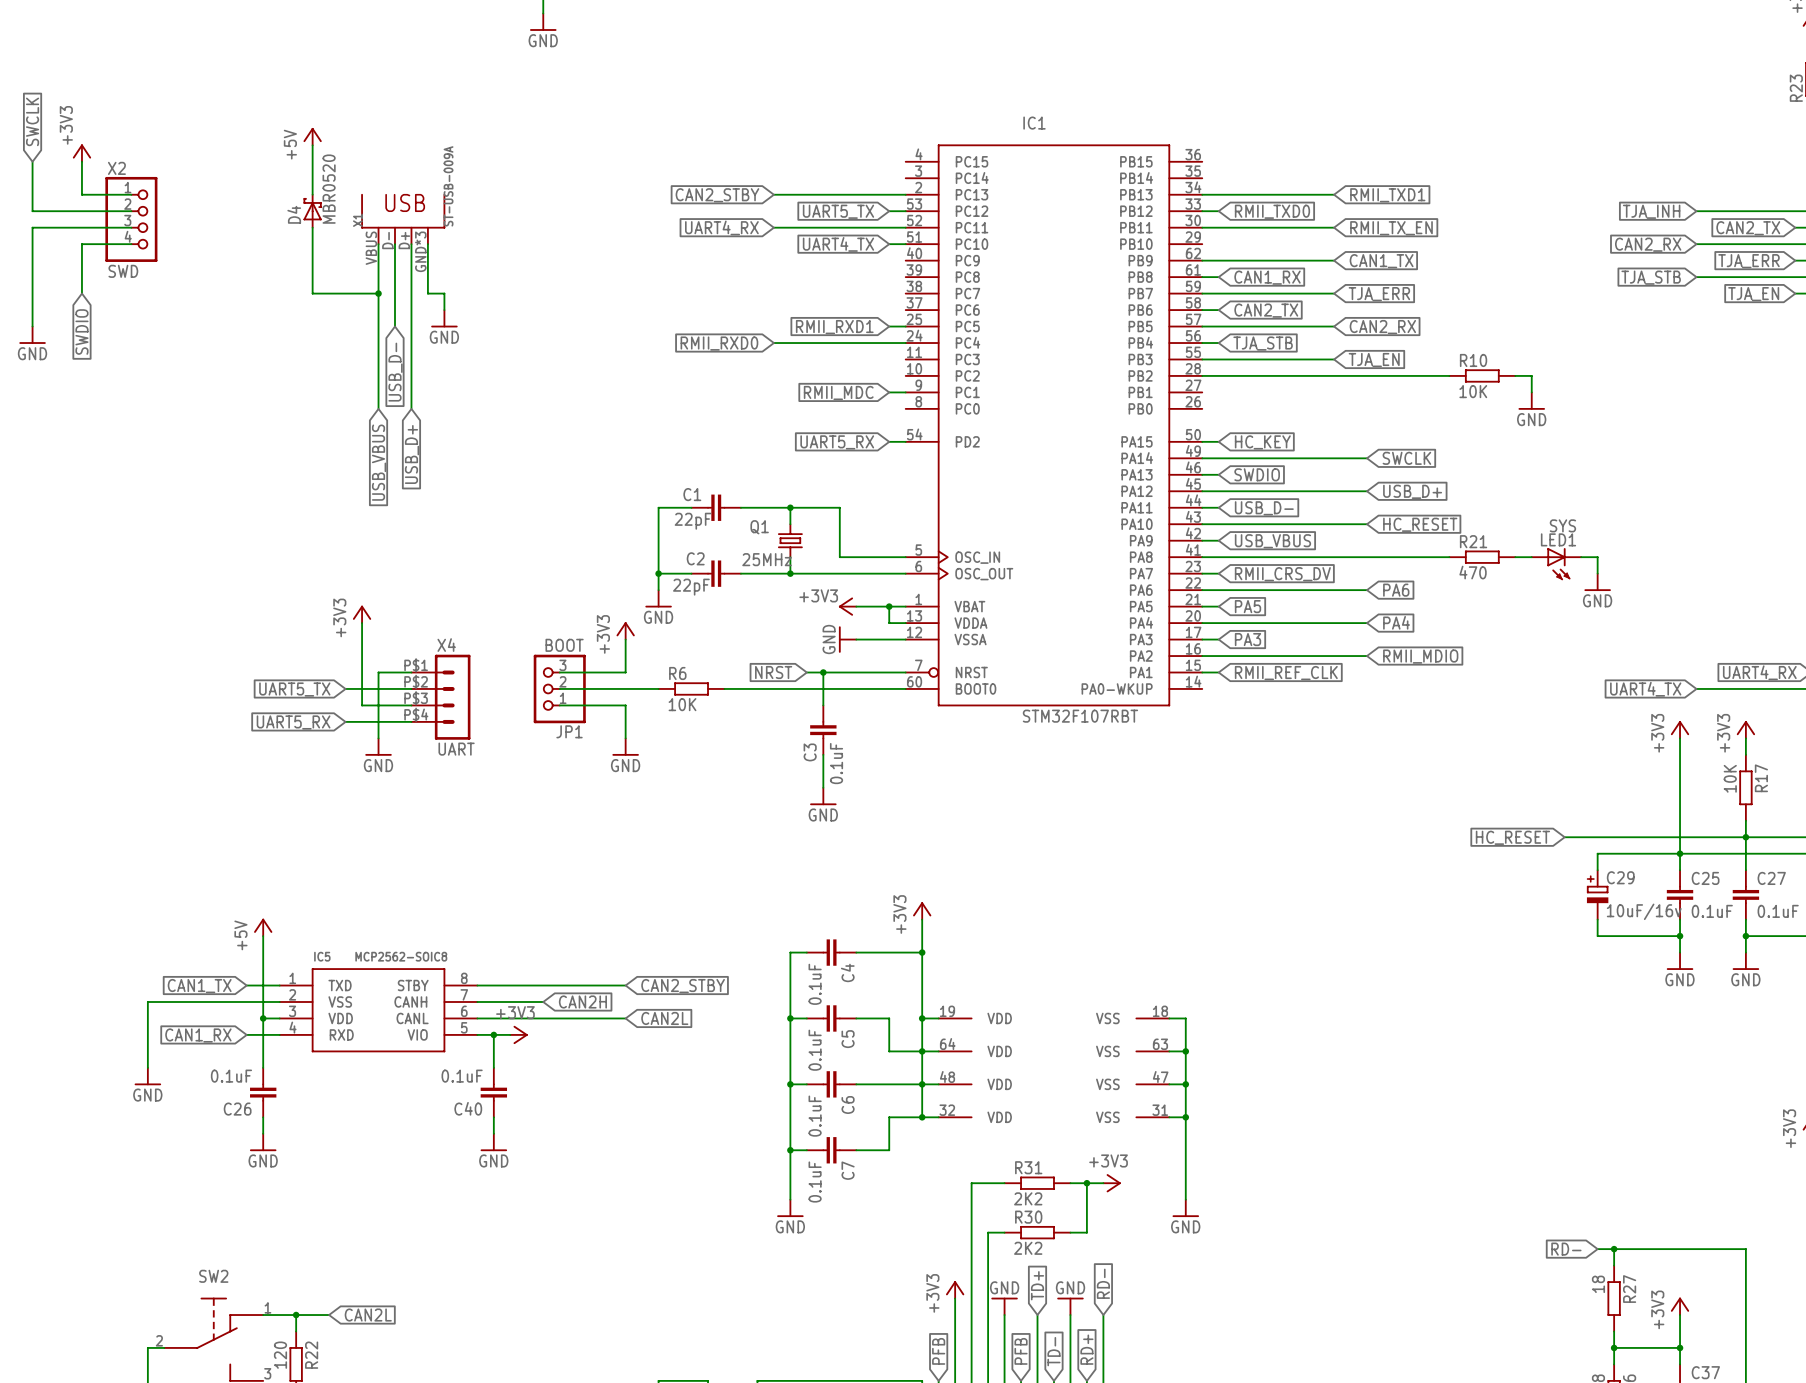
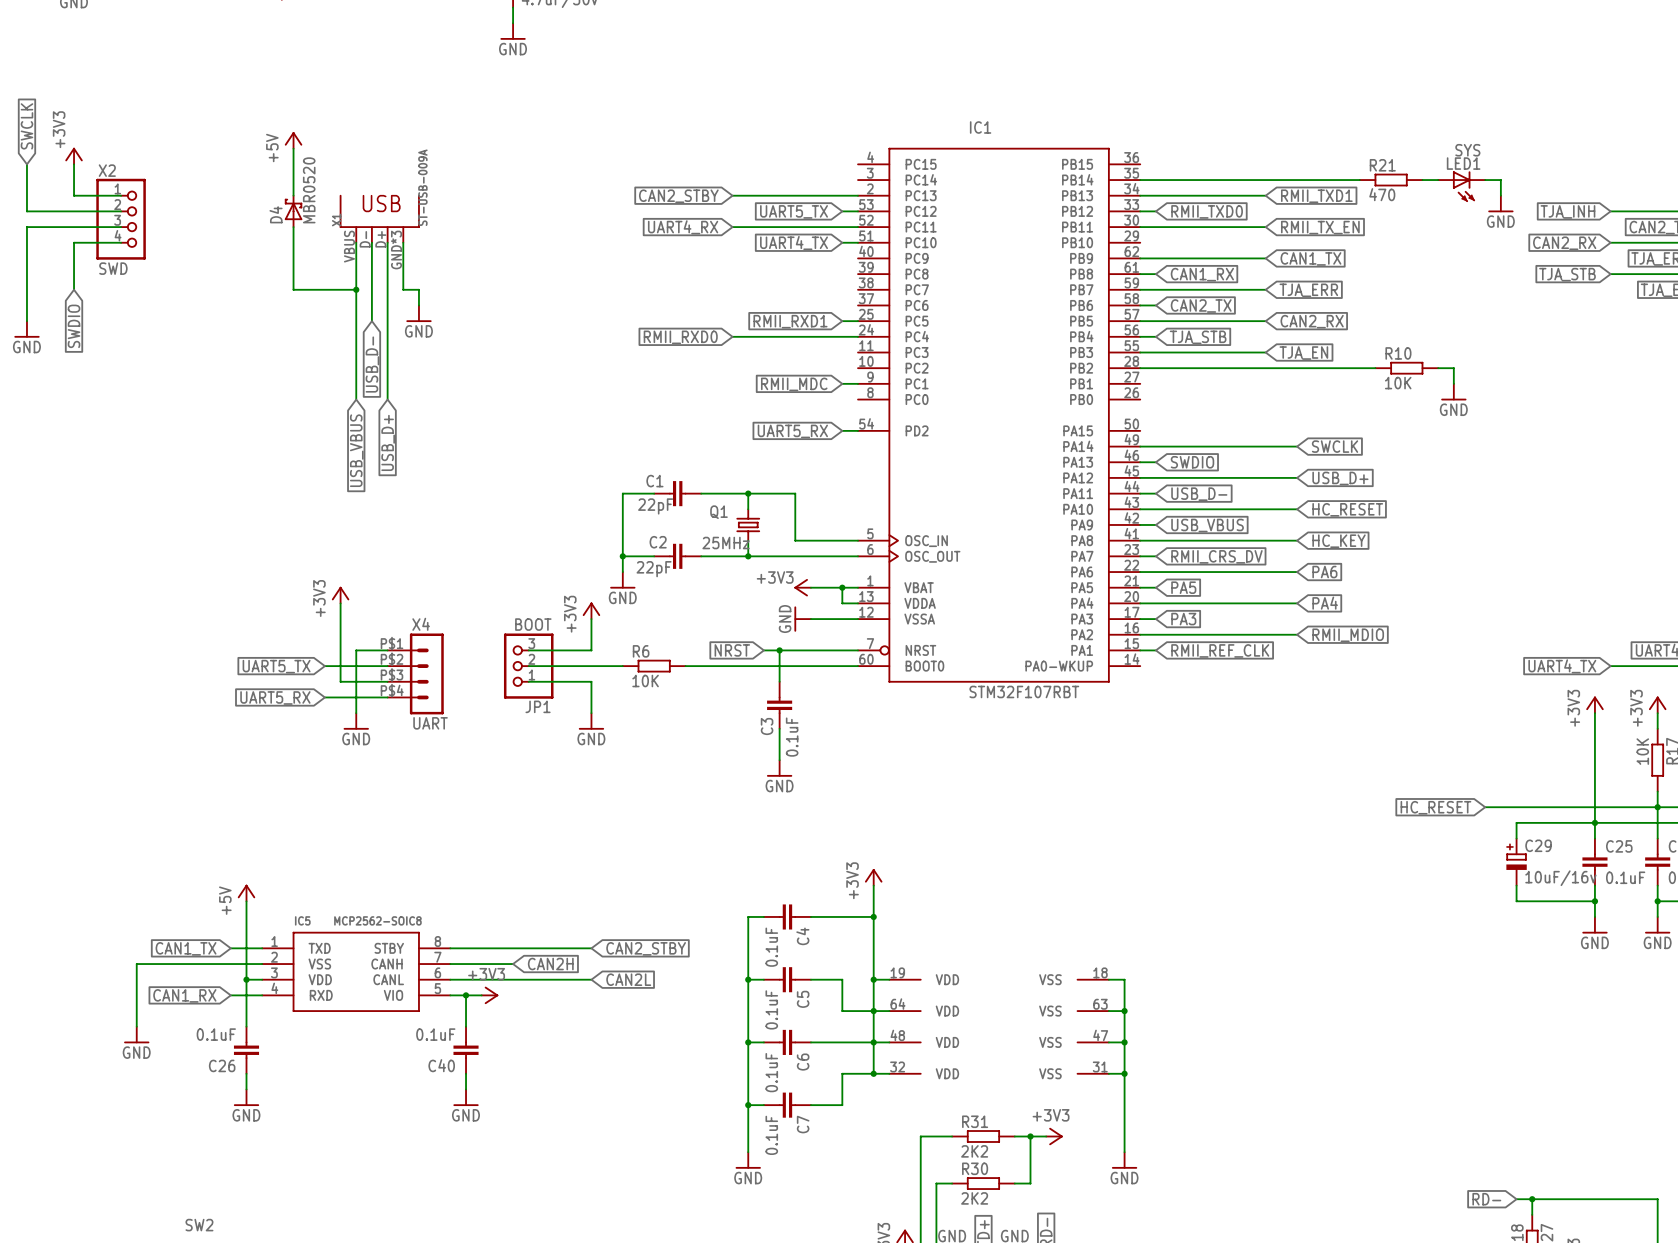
wire: none -> (1140, 180) (1359, 180)
wire: none -> (1422, 180) (1438, 180)
wire: none -> (1485, 180) (1500, 180) (1500, 195)
power symbol: none -> GND (1500, 203)
wire: (1202, 441) (1218, 441) -> none
global label: HC_KEY (1262, 442) -> none
wire: (1367, 557) (1449, 557) -> none
global label: none -> HC_KEY (1339, 541)
R21 position: (1482, 557) -> (1391, 180)
wire: (1515, 557) (1531, 557) -> none
wire: (1581, 557) (1597, 557) (1597, 573) -> none
LED1 position: (1556, 564) -> (1461, 186)
power symbol: GND (1597, 582) -> none

